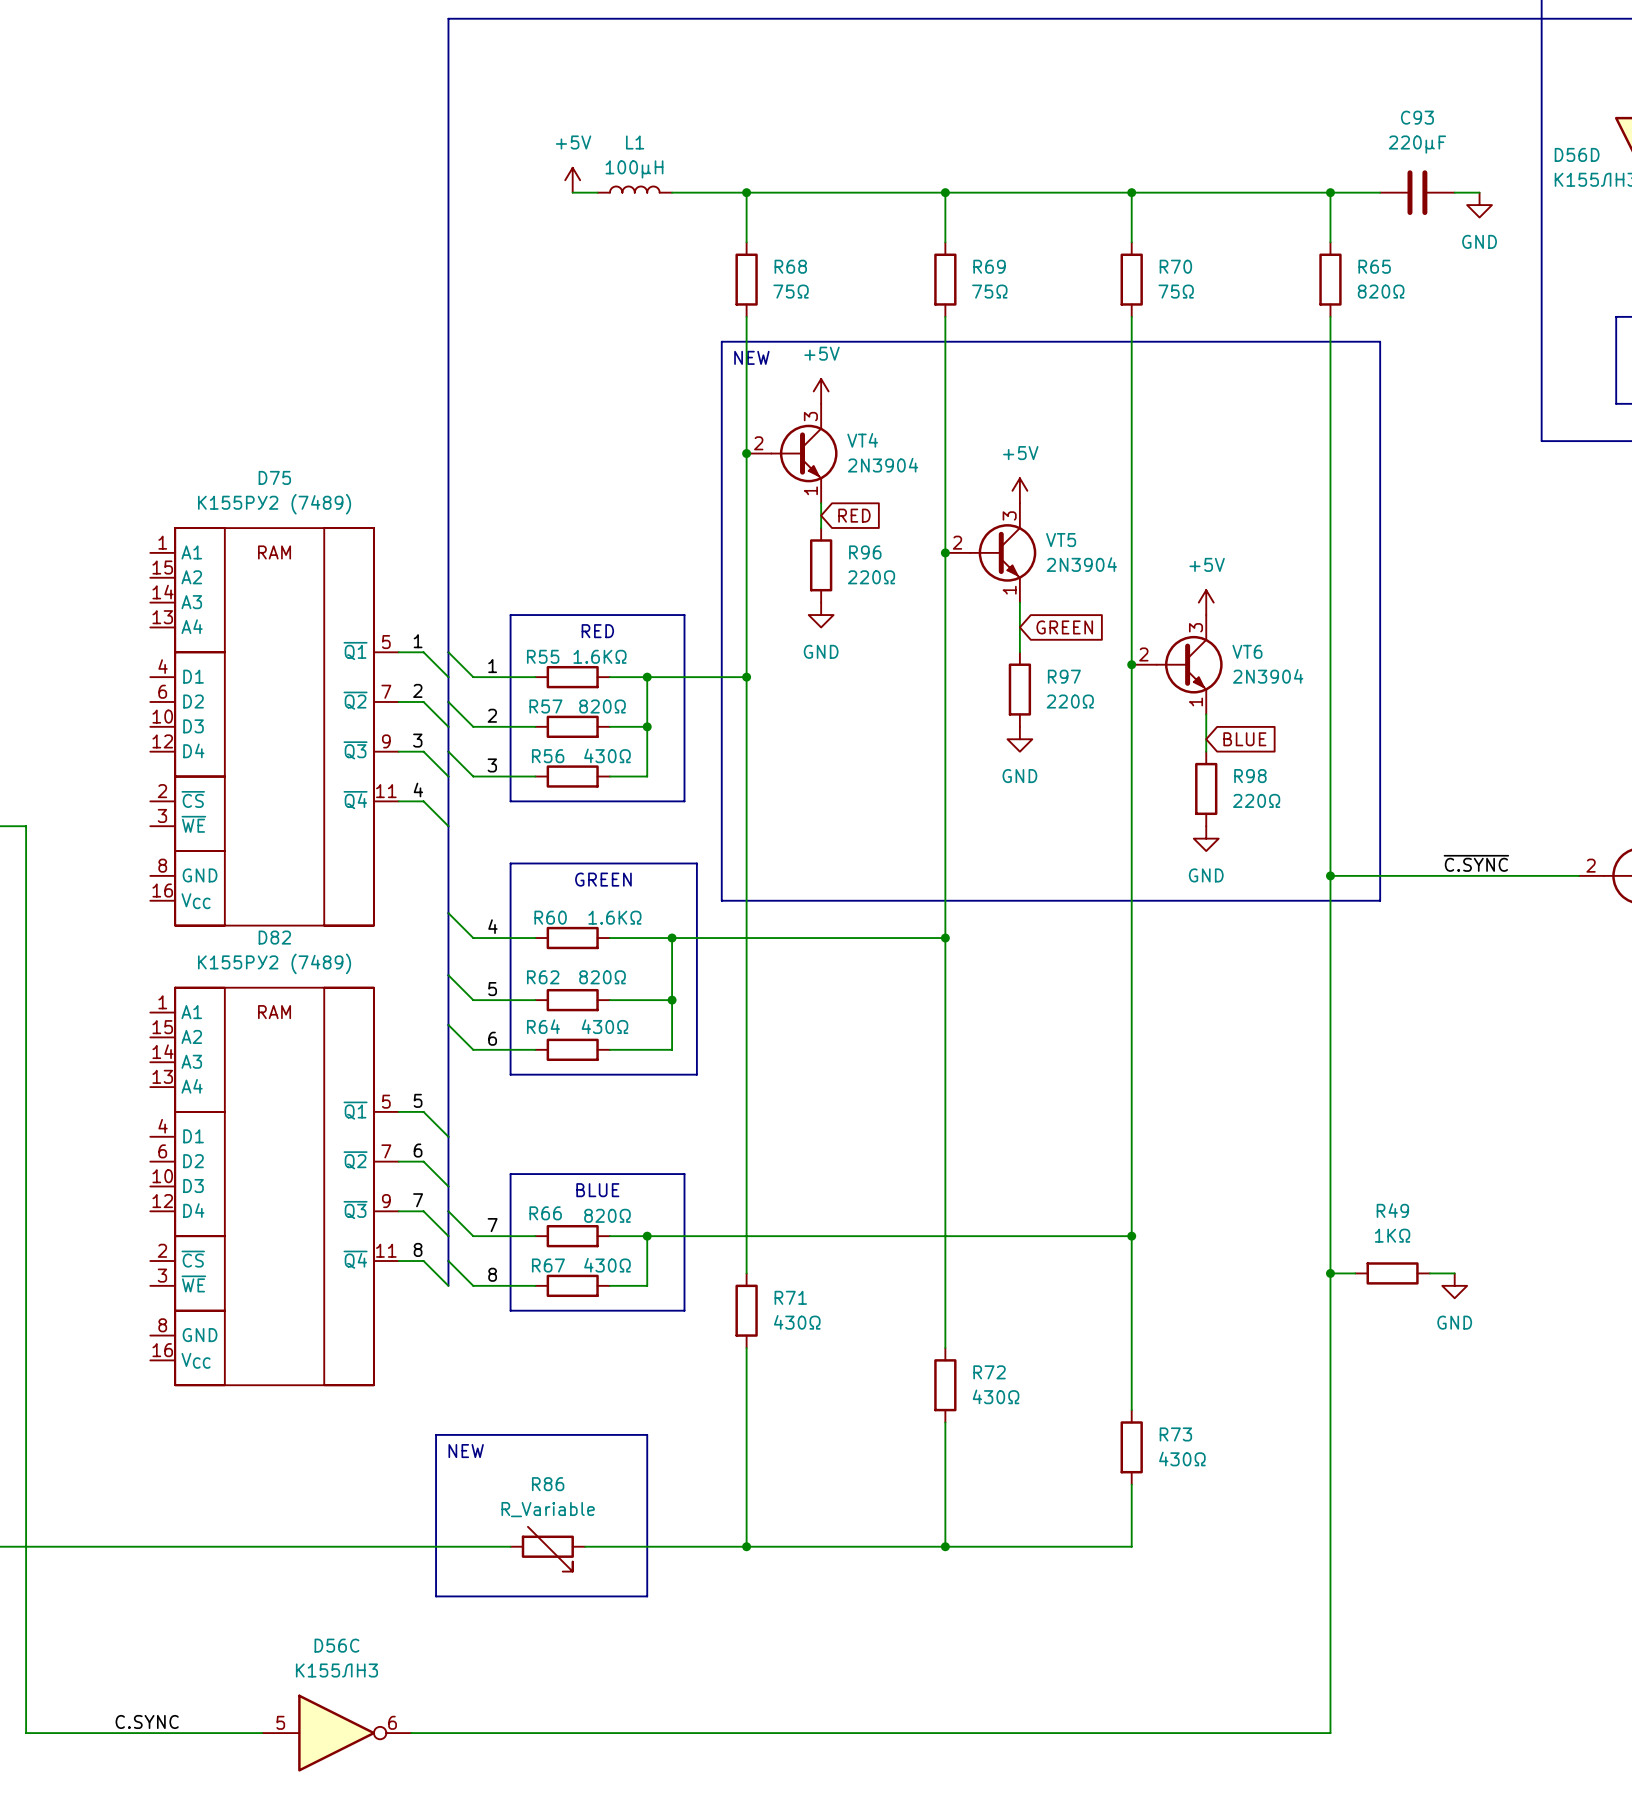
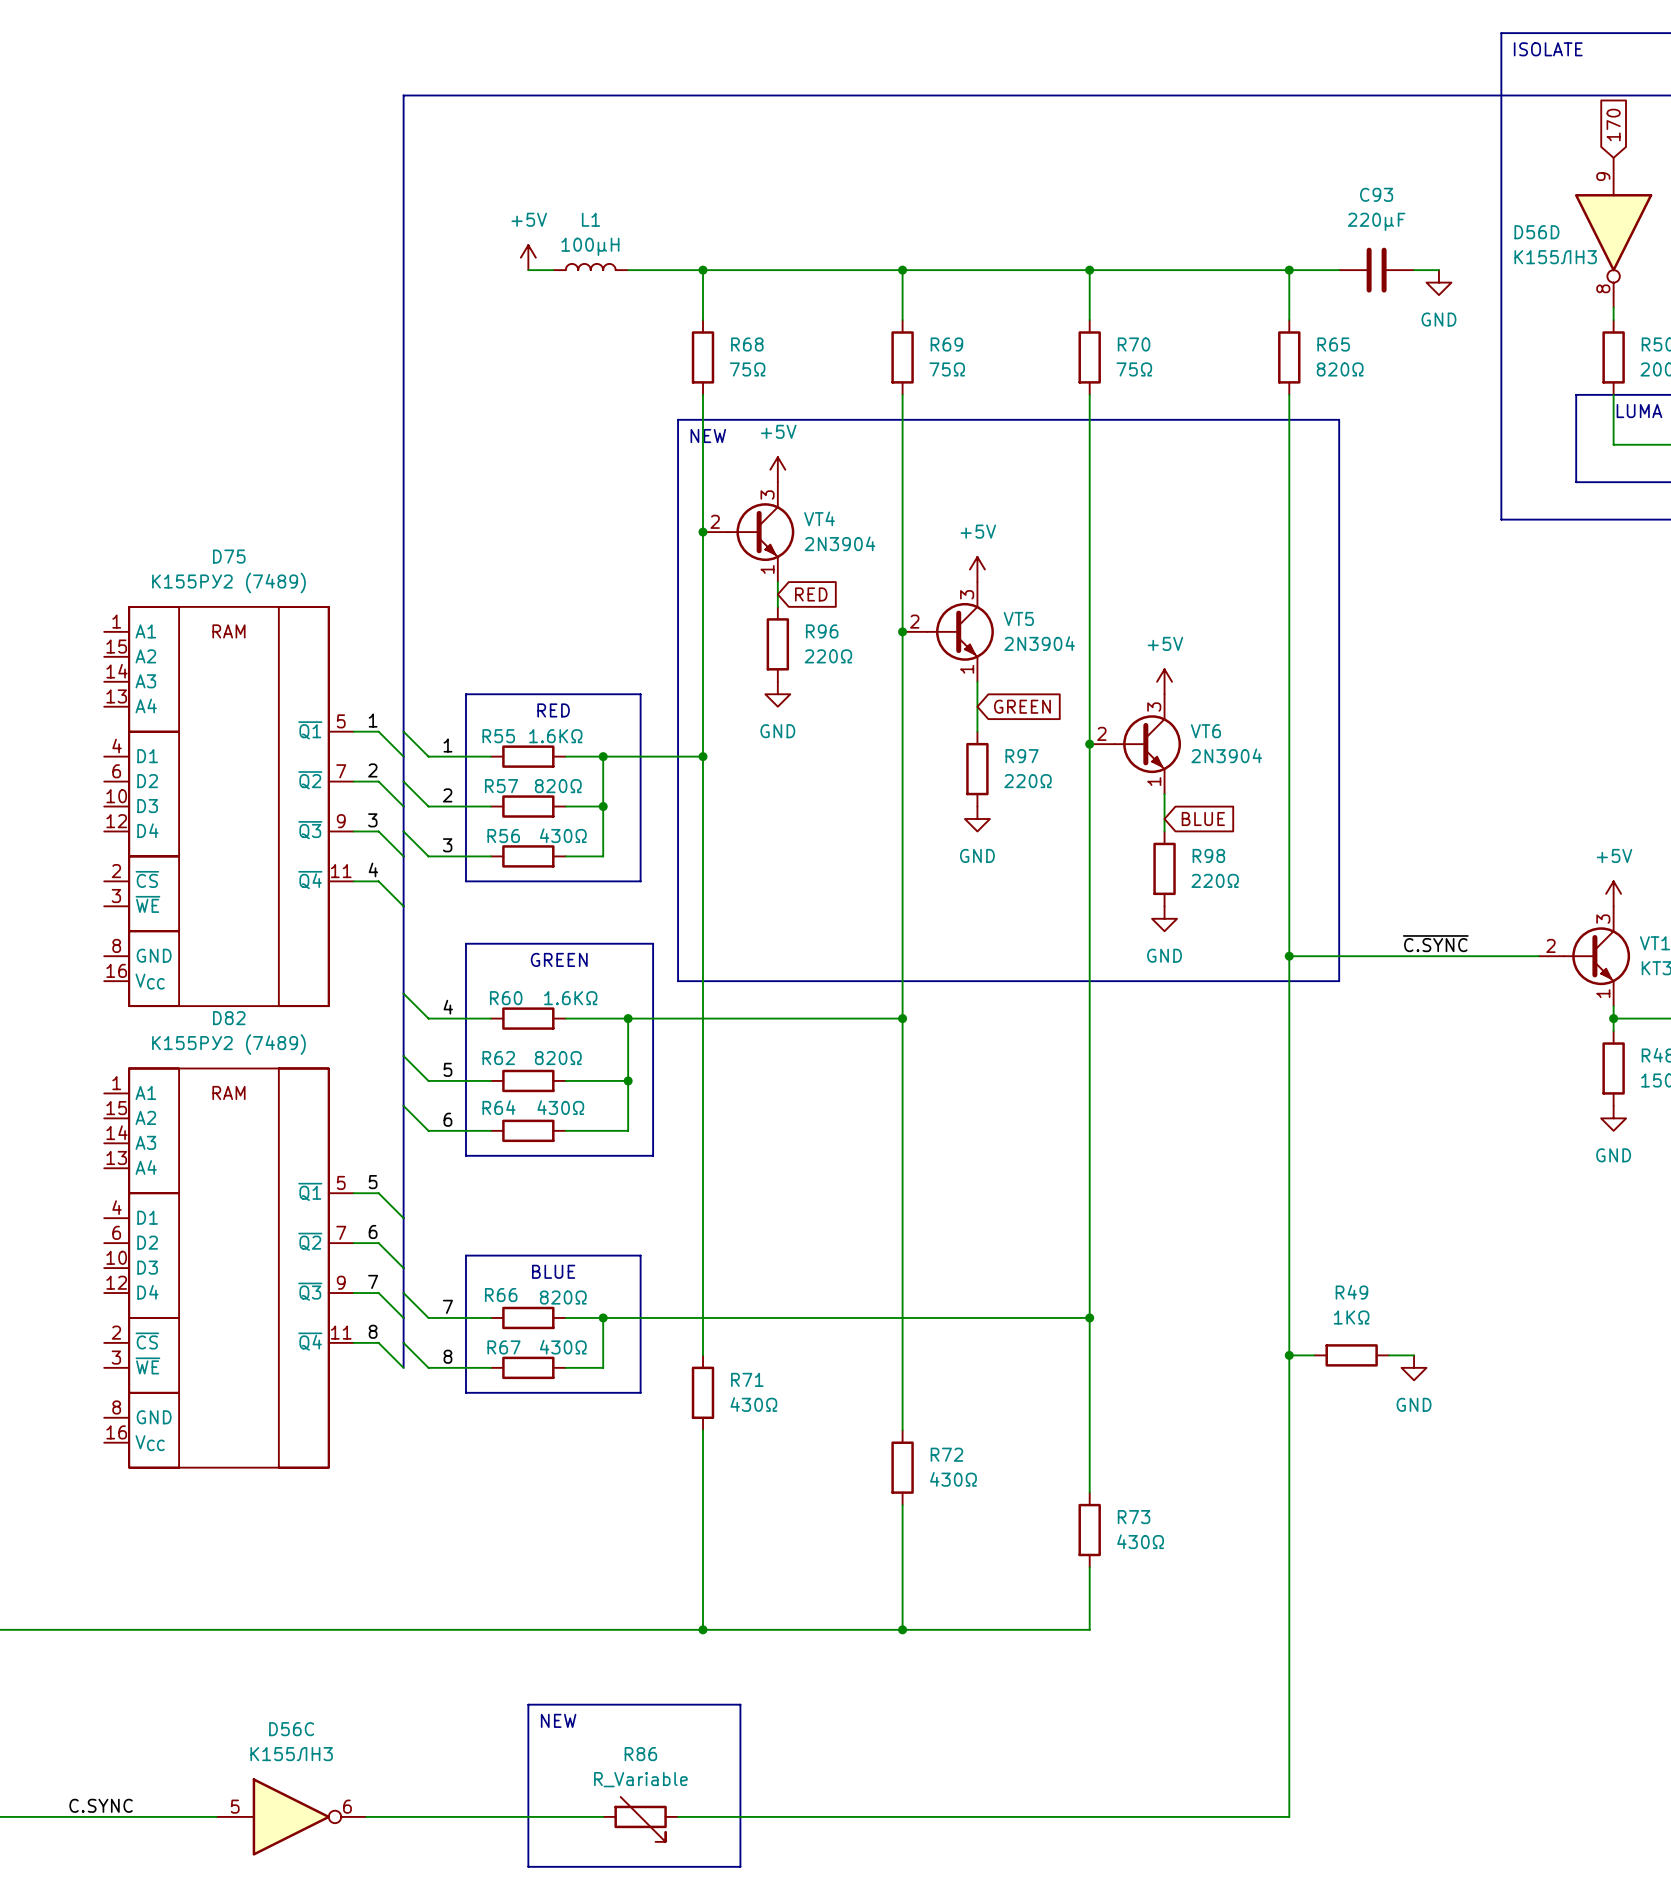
line: (436, 1434) (647, 1434) (647, 1596) (436, 1596) (436, 1434) -> (528, 1704) (740, 1704) (740, 1866) (528, 1866) (528, 1704)
text position: NEW (466, 1451) -> NEW (558, 1720)
R86 position: (547, 1549) -> (640, 1819)
wire: (647, 1733) (721, 1733) -> (465, 1629) (540, 1629)

